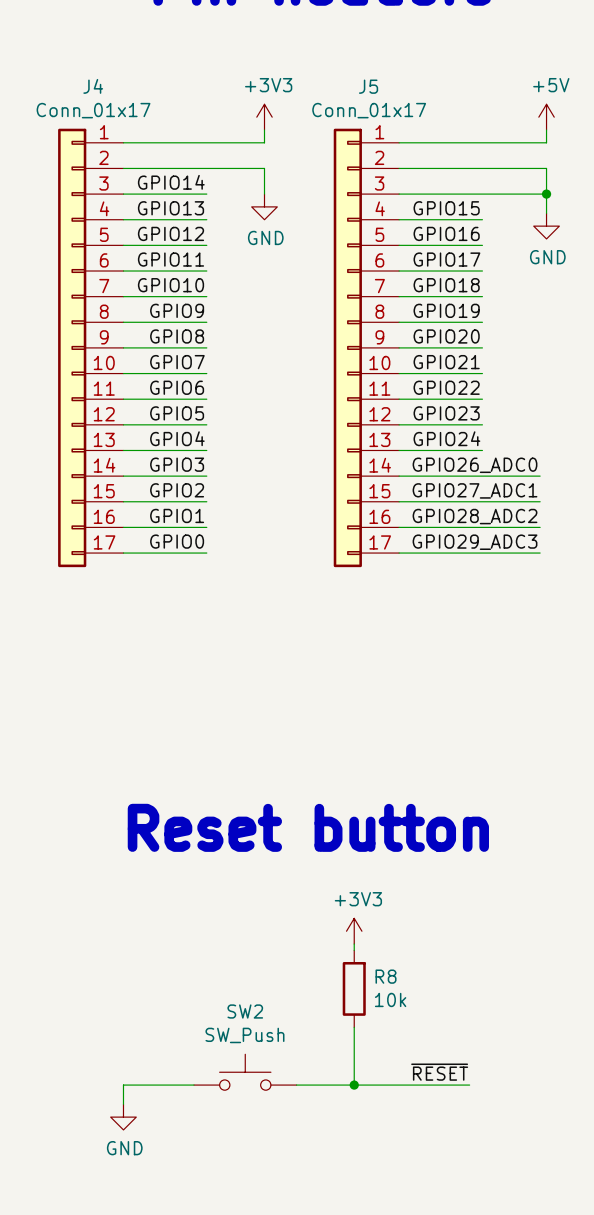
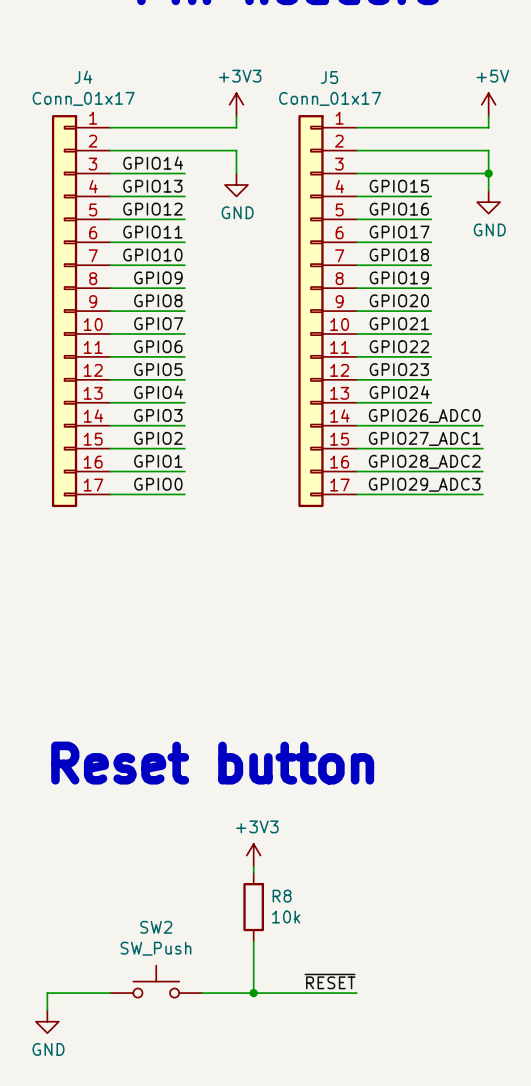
text position: Reset button (308, 827) -> Reset button (212, 763)
power symbol position: +3V3 (354, 931) -> +3V3 (253, 855)
wire: (354, 944) (354, 950) -> (253, 866) (253, 872)
R8 position: (354, 988) -> (253, 907)
wire: (354, 1027) (354, 1085) -> (253, 941) (253, 993)
SW2 position: (245, 1072) -> (156, 981)
label position: ~{RESET} (439, 1072) -> ~{RESET} (330, 981)
wire: (193, 1085) (123, 1085) (123, 1104) -> (110, 993) (47, 993) (47, 1010)
wire: (296, 1085) (469, 1085) -> (202, 993) (356, 993)
junction: (354, 1085) -> none
junction: none -> (253, 993)
power symbol position: GND (123, 1117) -> GND (47, 1021)

